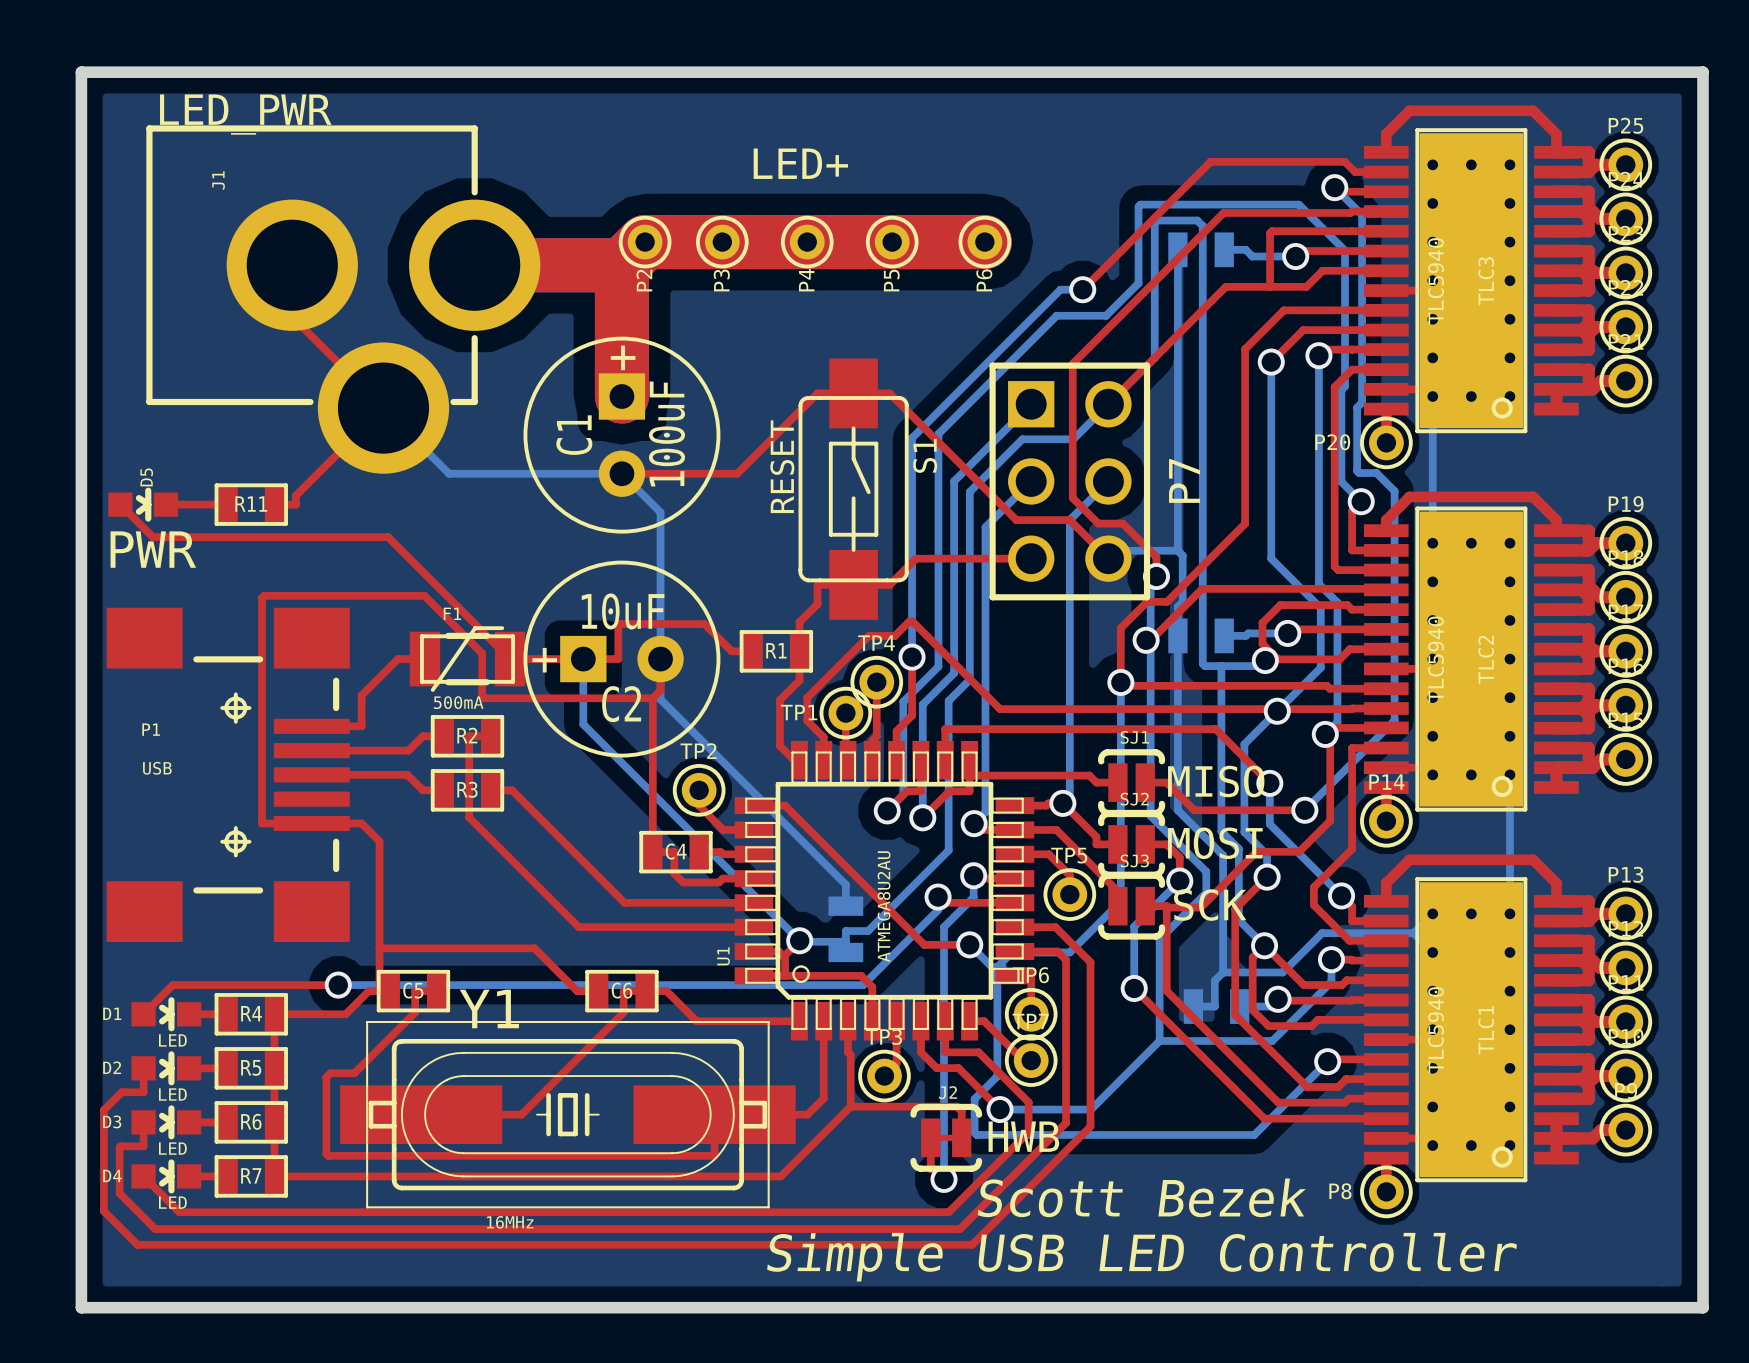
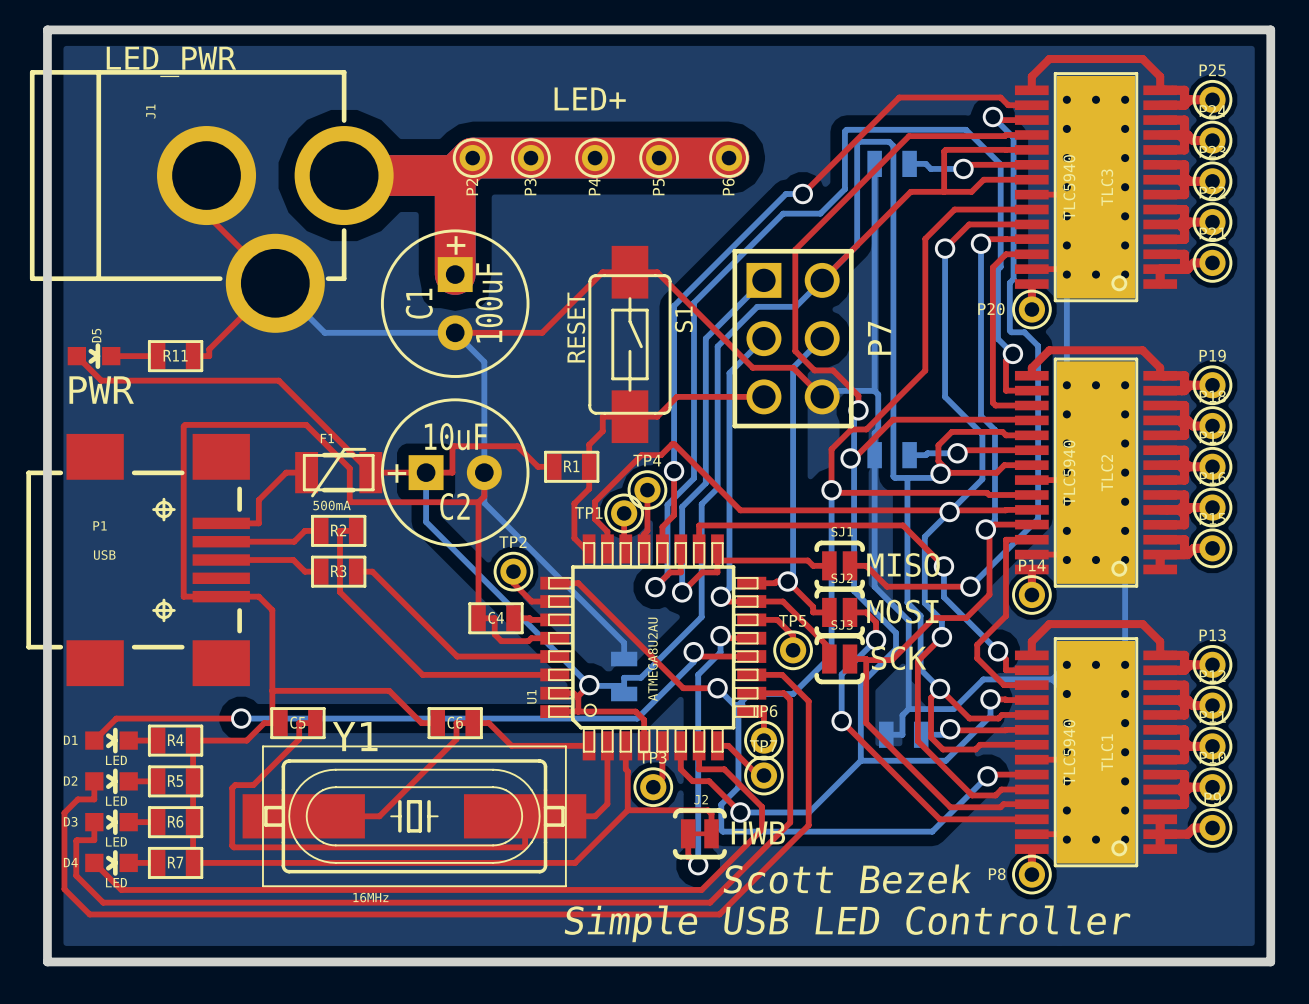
J1 footprint: [146, 125, 541, 474] -> [29, 70, 394, 333]
P1 footprint: [106, 607, 350, 943] -> [26, 433, 250, 687]

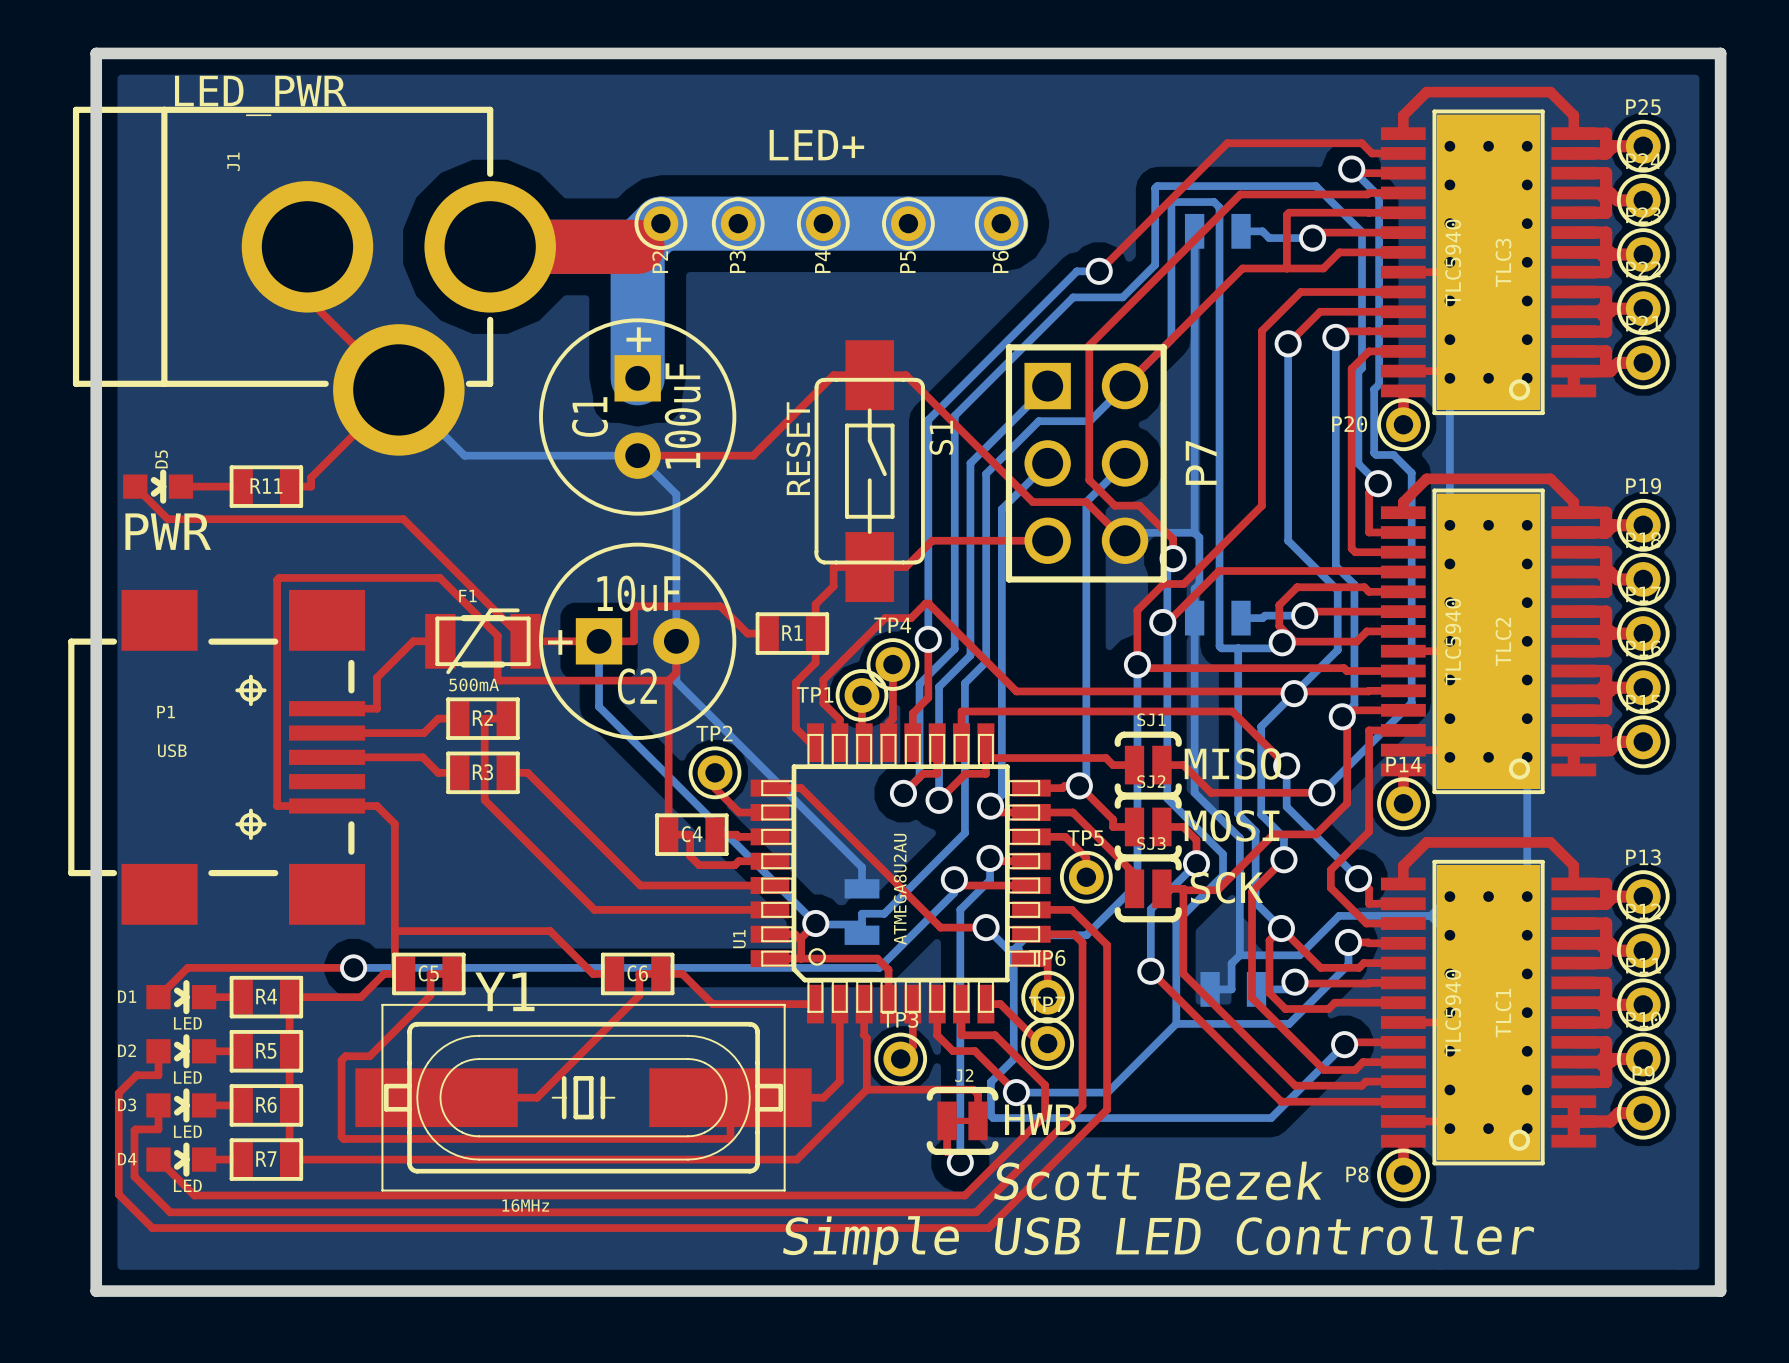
top track: (729, 158) (472, 158) (455, 175) (455, 274) -> none

